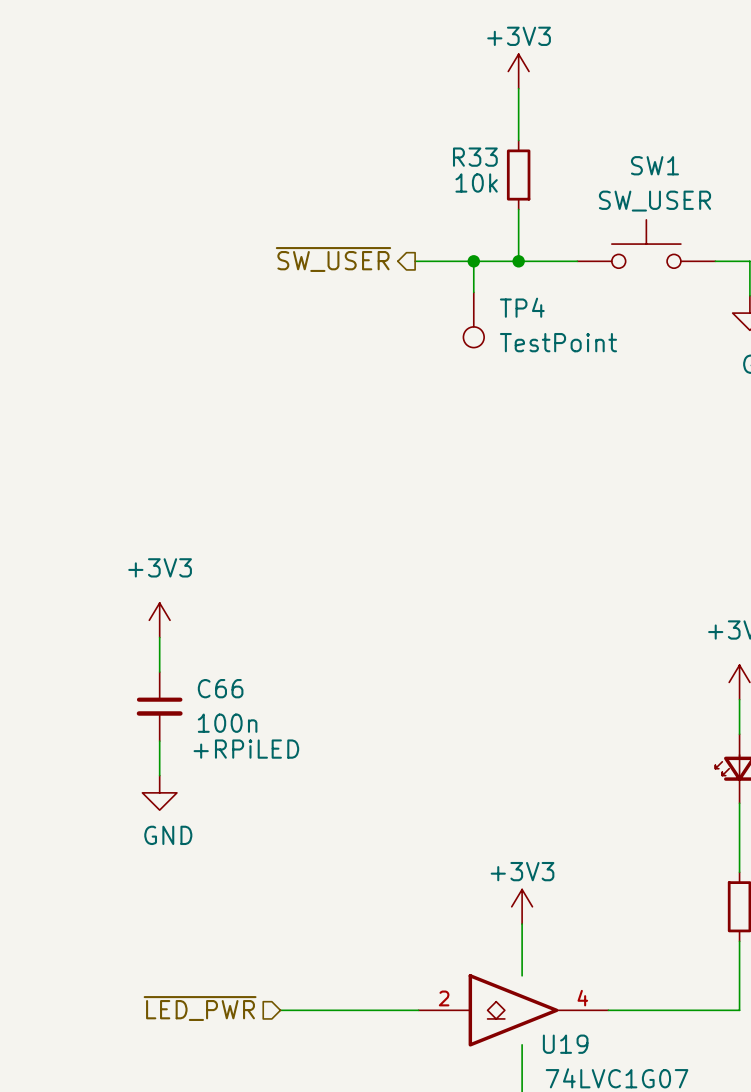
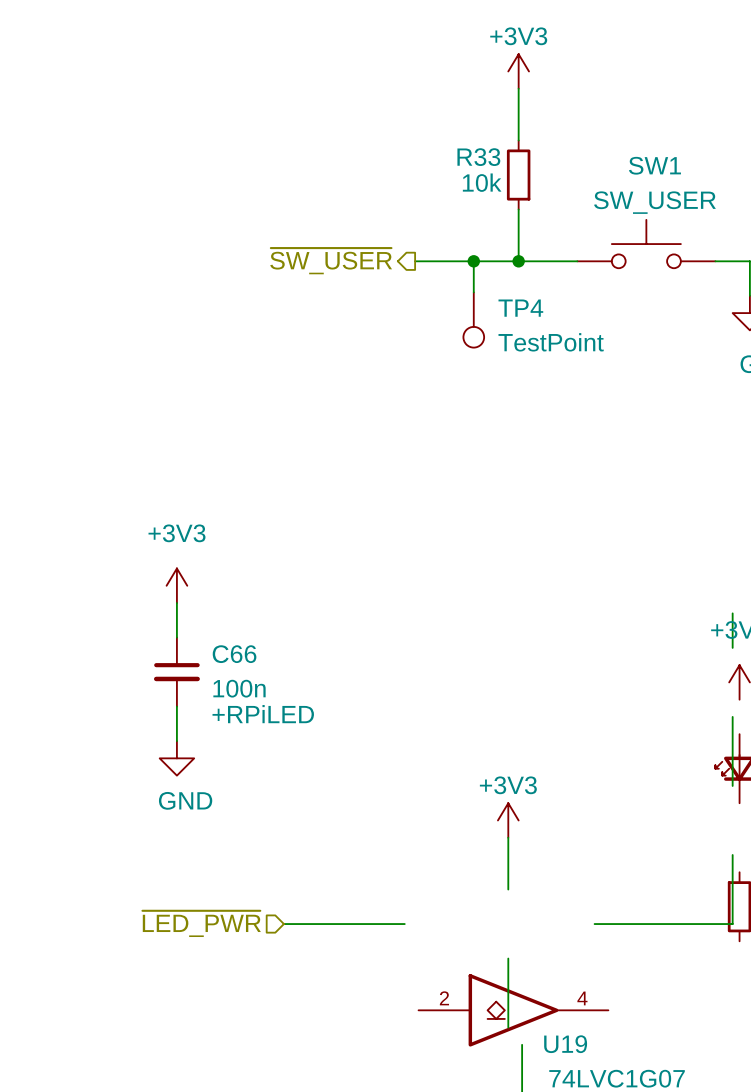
power symbol position: +3V3 (159, 620) -> +3V3 (176, 585)
wire: (159, 637) (159, 672) -> (176, 603) (176, 637)
wire: (739, 699) (739, 734) -> (732, 613) (732, 647)
C66 position: (159, 706) -> (176, 672)
wire: (159, 741) (159, 775) -> (176, 706) (176, 741)
power symbol position: GND (159, 792) -> GND (176, 758)
wire: (739, 803) (739, 872) -> (732, 716) (732, 785)
wire: none -> (732, 855) (732, 924) (594, 924)
power symbol position: +3V3 (522, 906) -> +3V3 (508, 820)
wire: none -> (283, 924) (404, 924)
wire: (522, 924) (522, 975) -> (508, 837) (508, 889)
wire: (739, 941) (739, 1010) (608, 1010) -> none
wire: none -> (508, 958) (508, 1027)
hierarchical label position: ~{LED_PWR} (200, 1008) -> ~{LED_PWR} (201, 923)
wire: (280, 1010) (418, 1010) -> none

